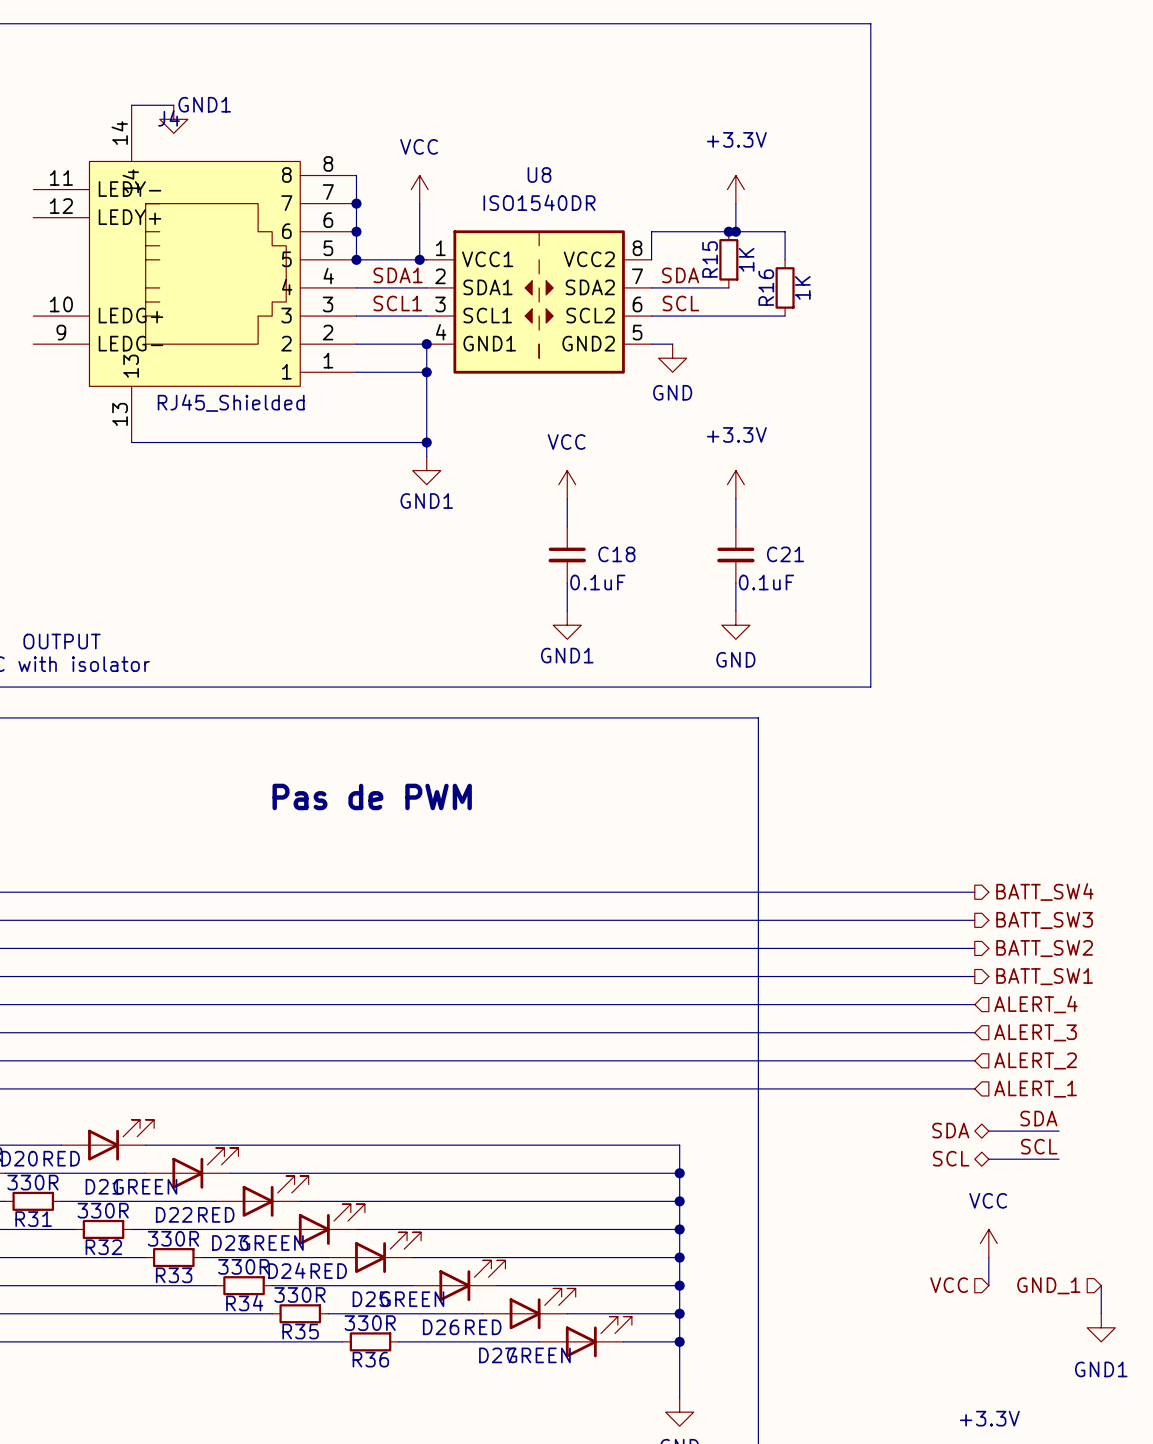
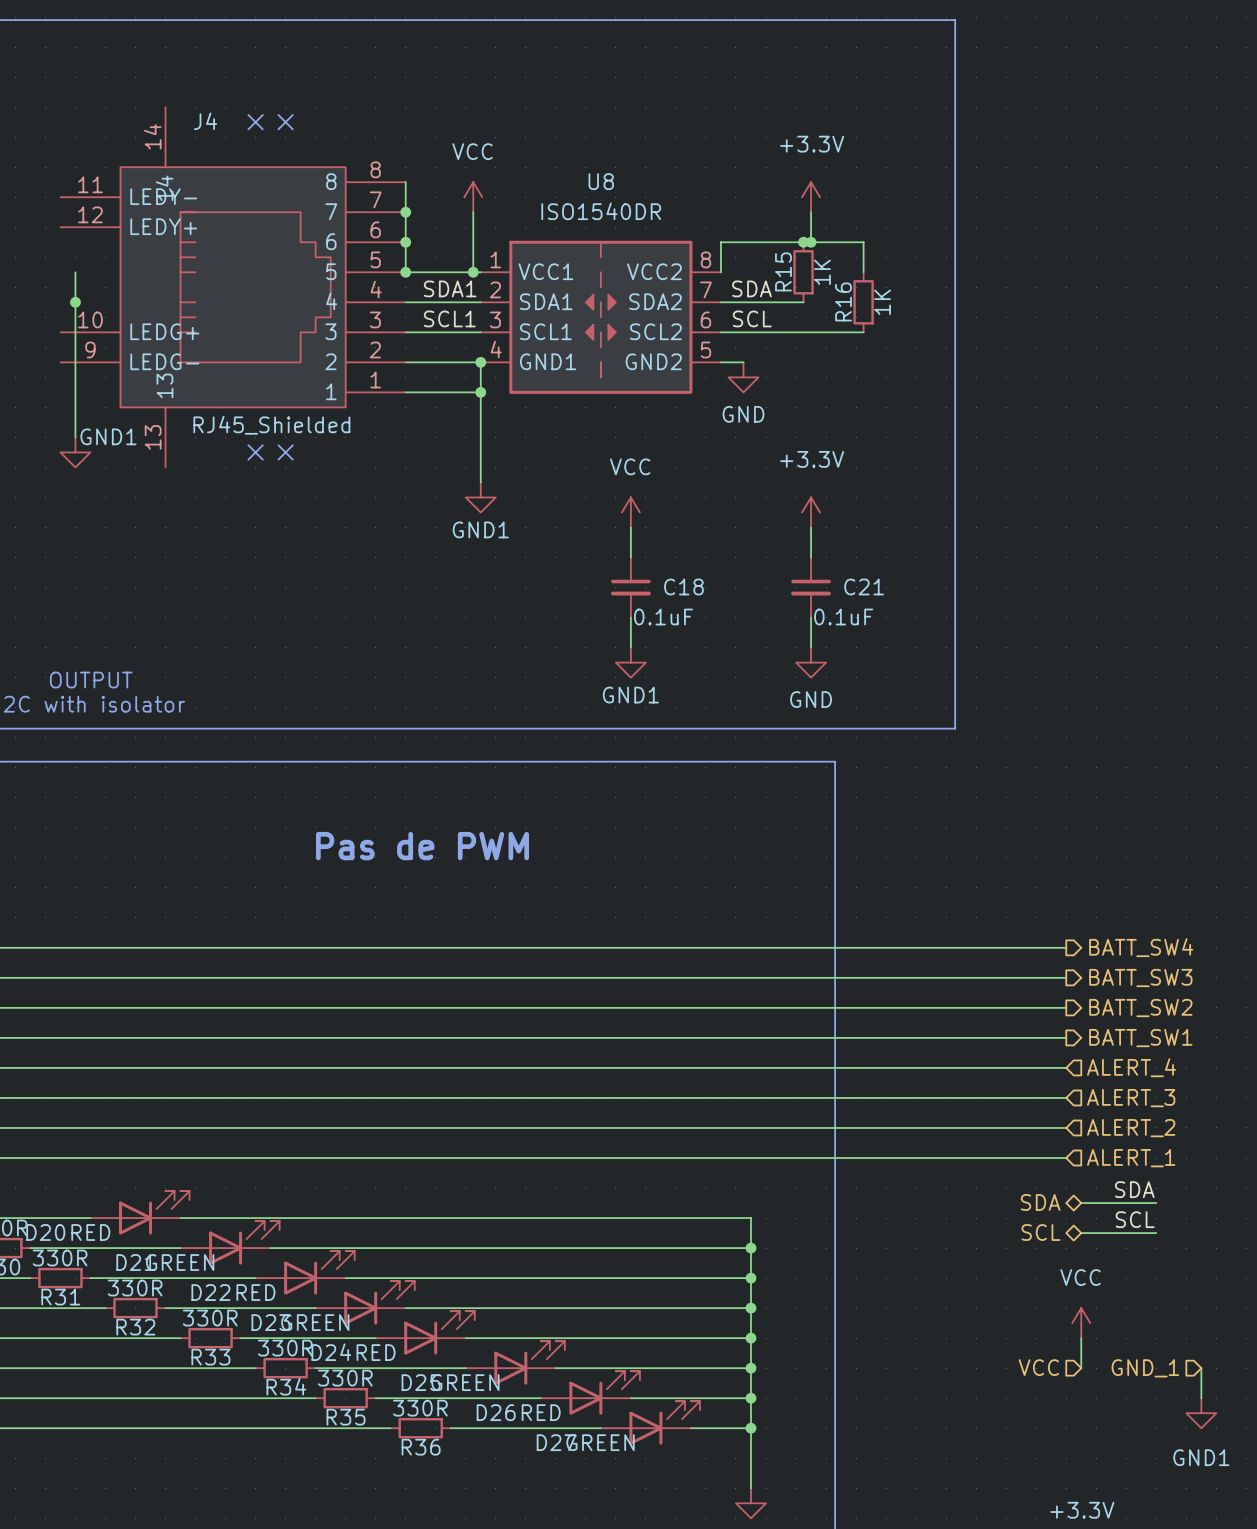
wire: (131, 105) (173, 105) -> none
power symbol: GND1 (173, 119) -> none
no-connect mark: none -> (255, 122)
no-connect mark: none -> (285, 122)
wire: none -> (75, 272) (75, 437)
junction: none -> (75, 302)
power symbol: none -> GND1 (75, 452)
no-connect mark: none -> (255, 452)
no-connect mark: none -> (285, 452)
wire: (131, 442) (426, 442) -> none
junction: (426, 442) -> none

